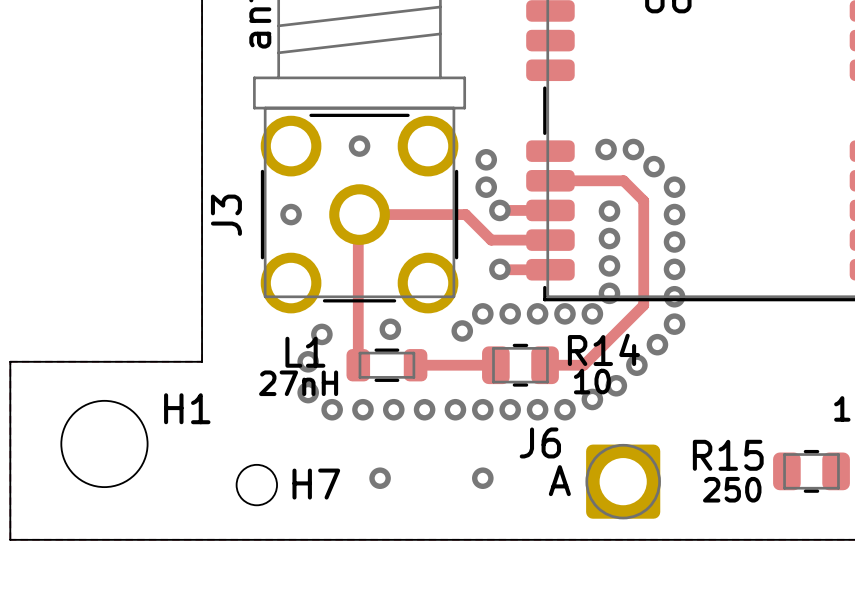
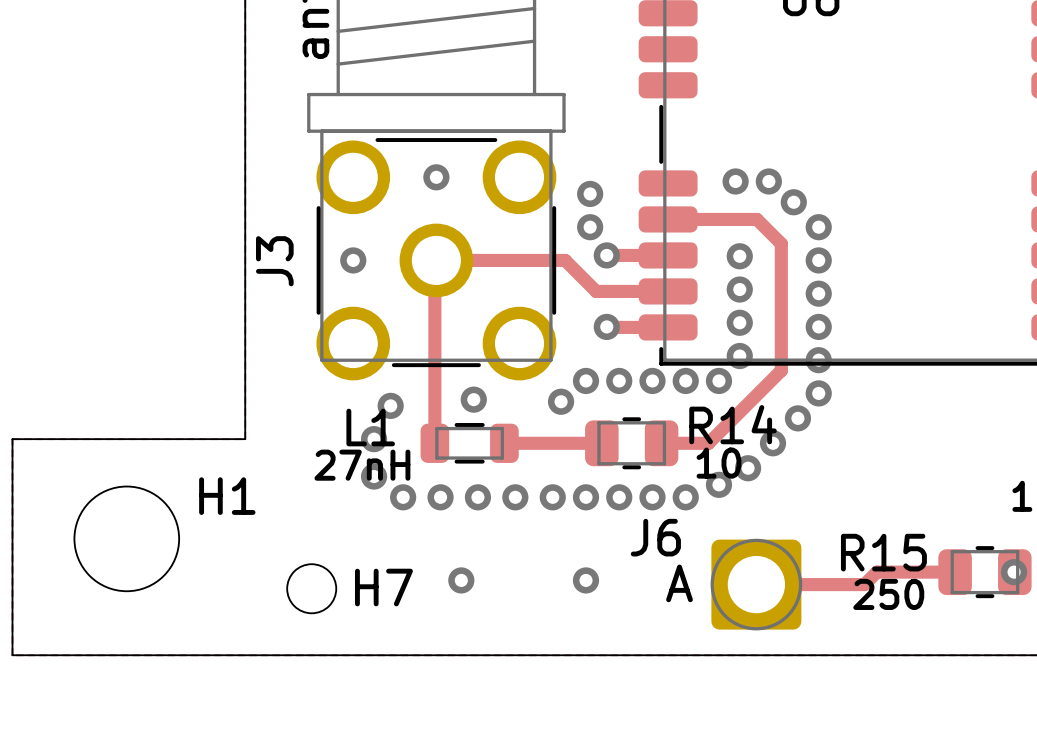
top track: none -> (955, 572) (876, 572) (864, 584) (756, 584)
via: none -> (1014, 572)

